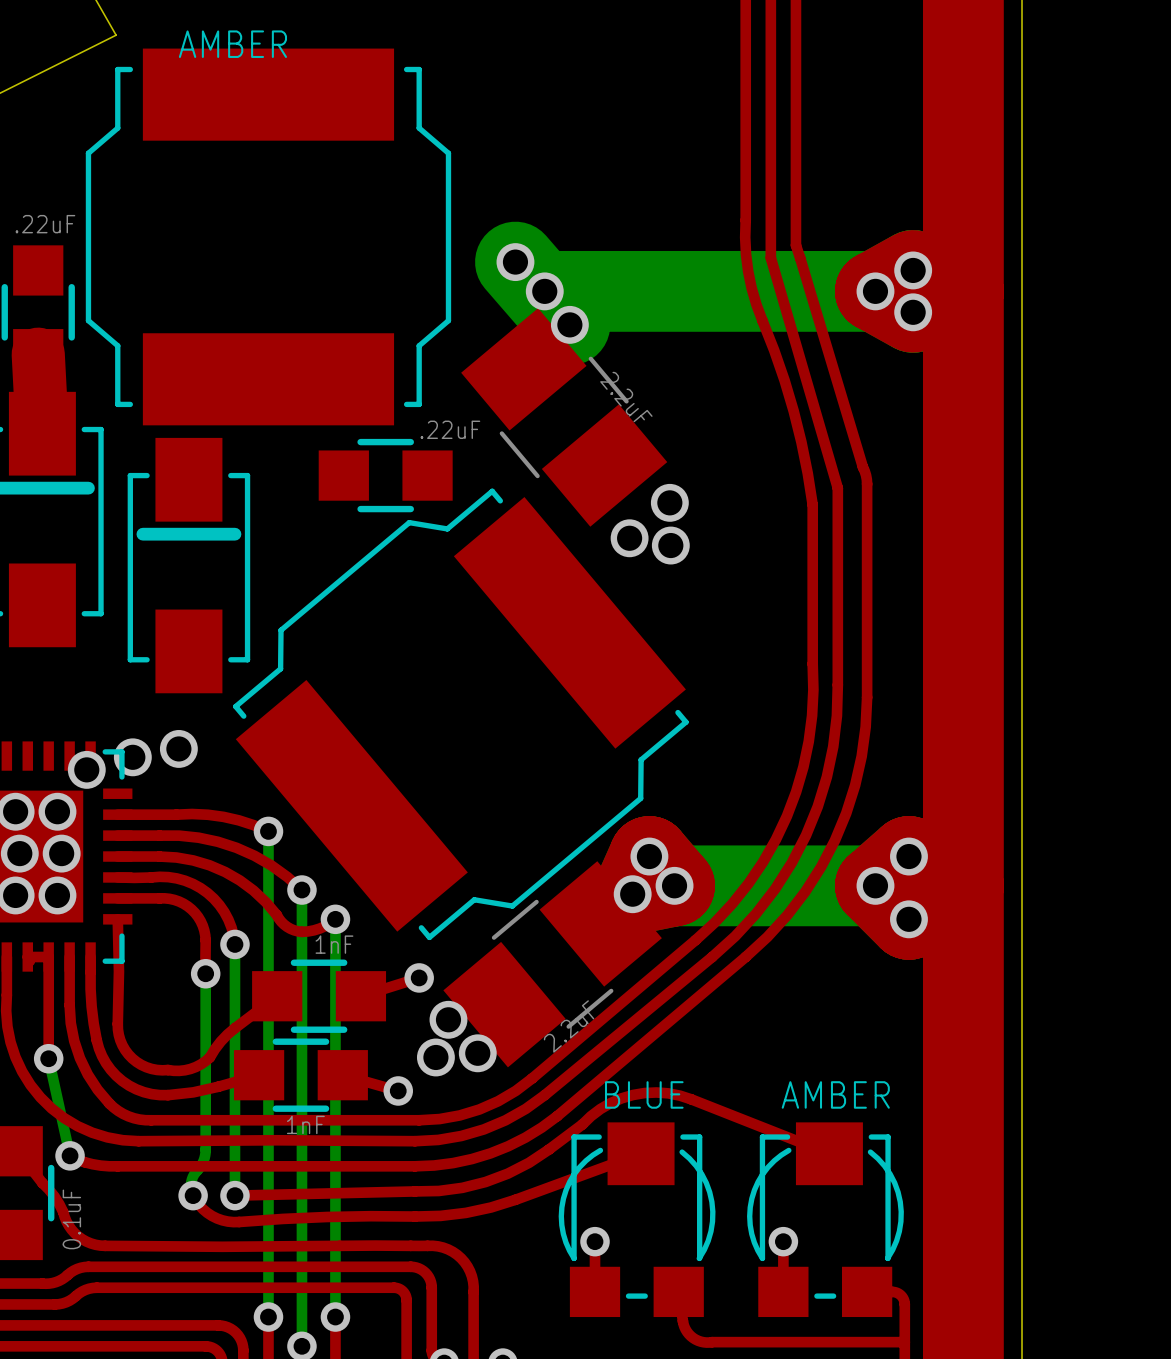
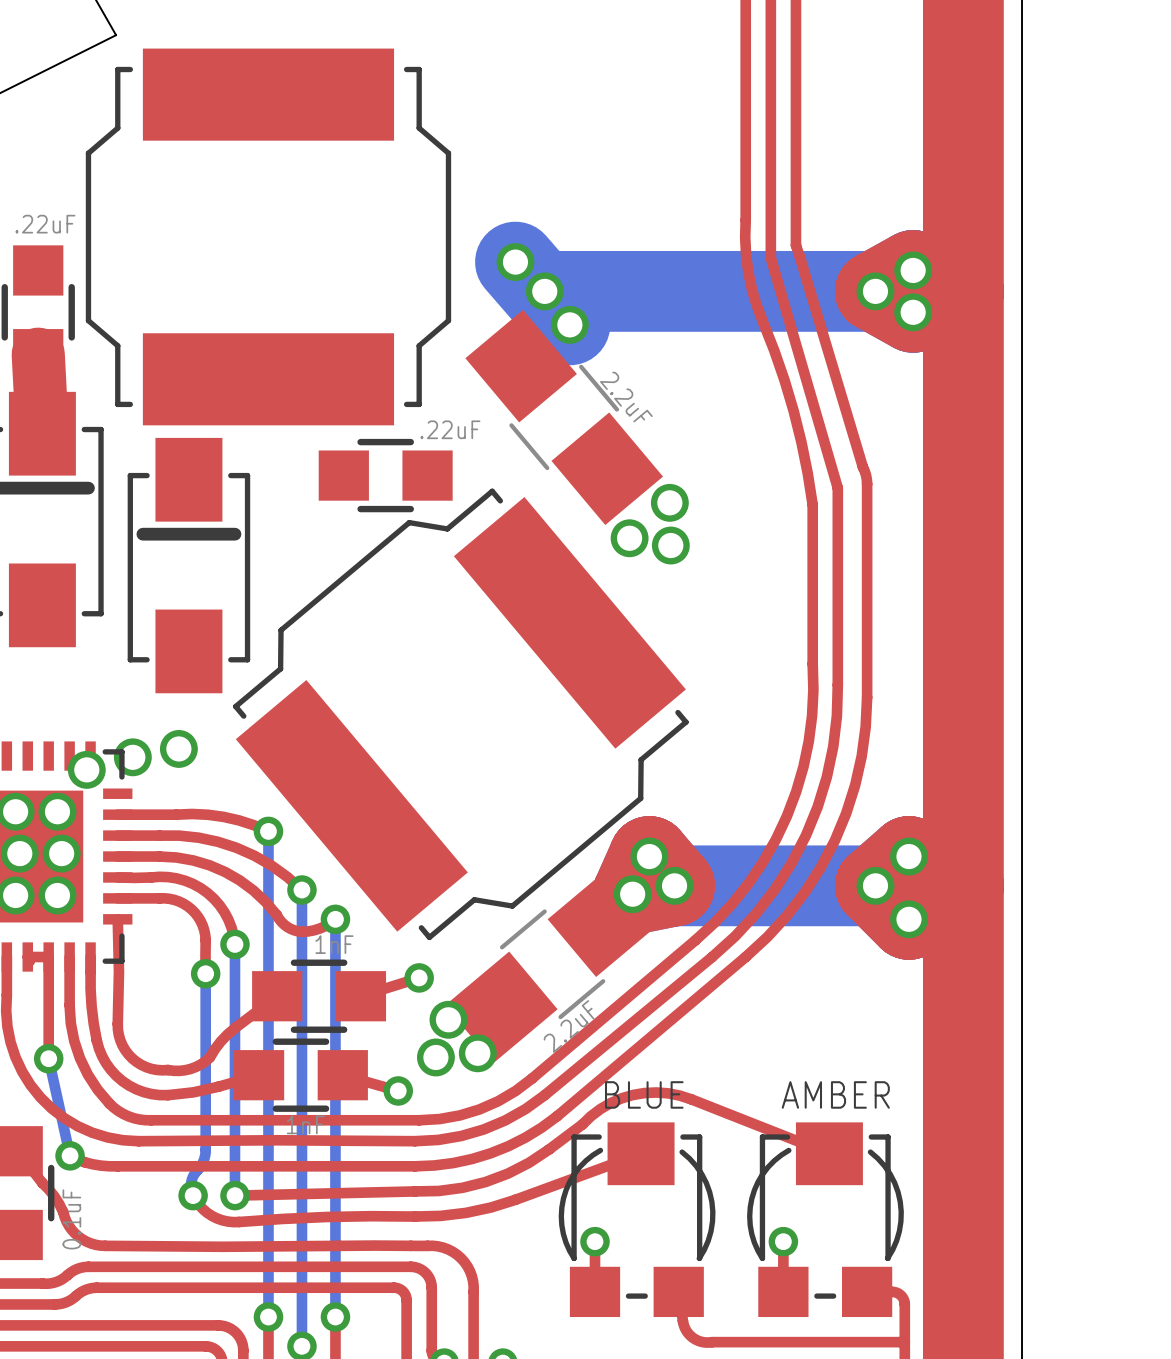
text: AMBER (232, 44) -> none
part footprint: [461, 308, 668, 527] -> [465, 309, 664, 526]
part footprint: [443, 861, 662, 1068] -> [445, 865, 661, 1064]

